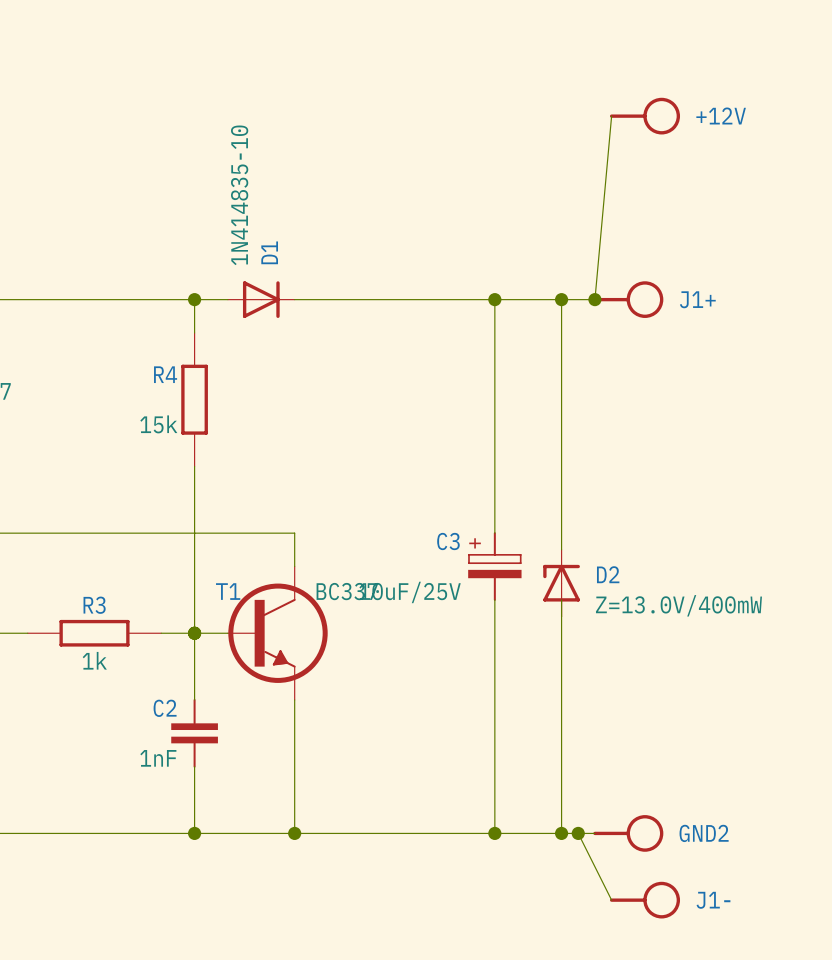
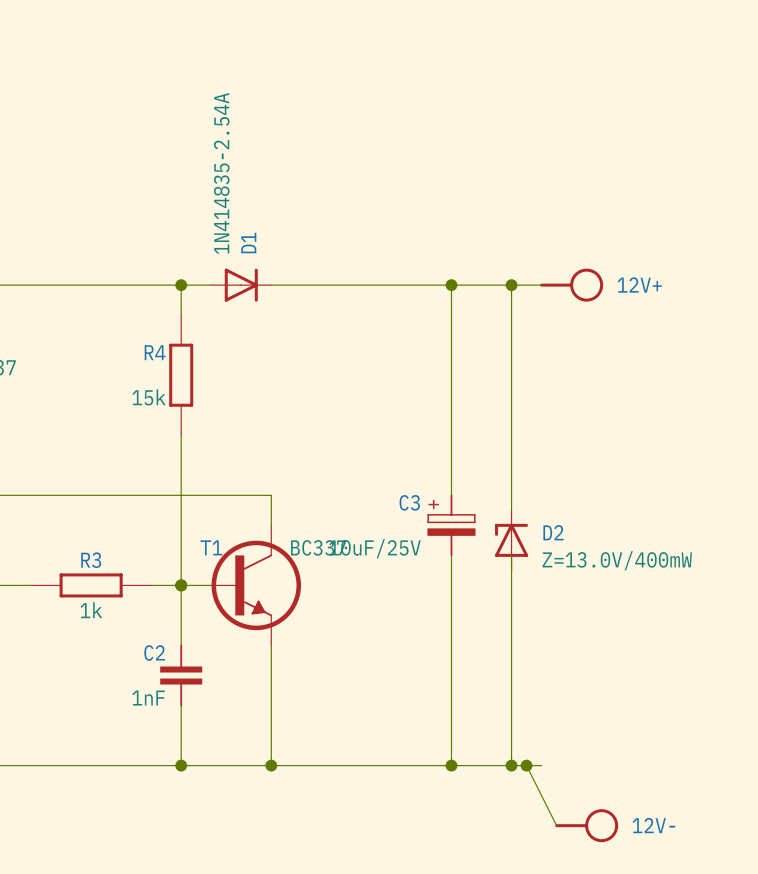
wire: (611, 116) (594, 299) -> none
+12V: (644, 116) -> none
D1 value: 1N414835-10 (239, 195) -> 1N414835-2.54A (221, 173)
junction: (594, 299) -> none
J1+ name: J1+ (697, 299) -> 12V+ (639, 284)
GND2: (628, 833) -> none
J1- name: J1- (713, 900) -> 12V- (653, 825)

